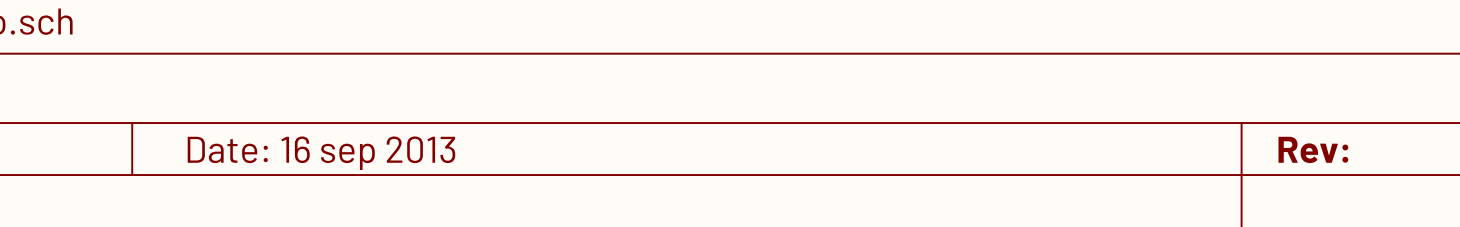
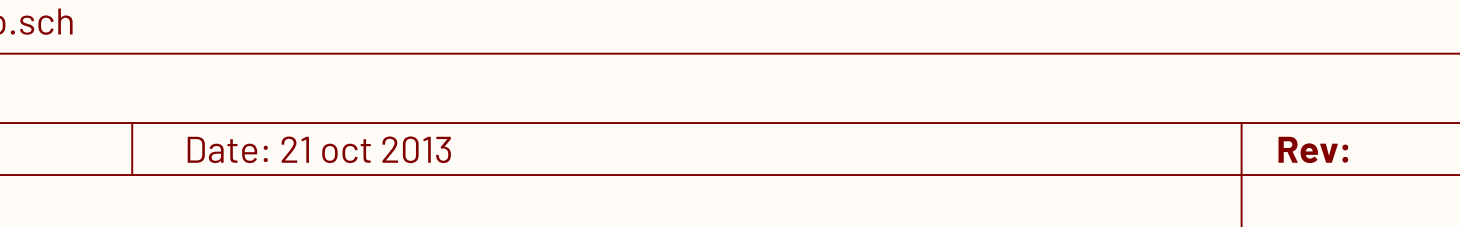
title block: Date: 16 sep 2013 (321, 153) -> Date: 21 oct 2013 (319, 149)

